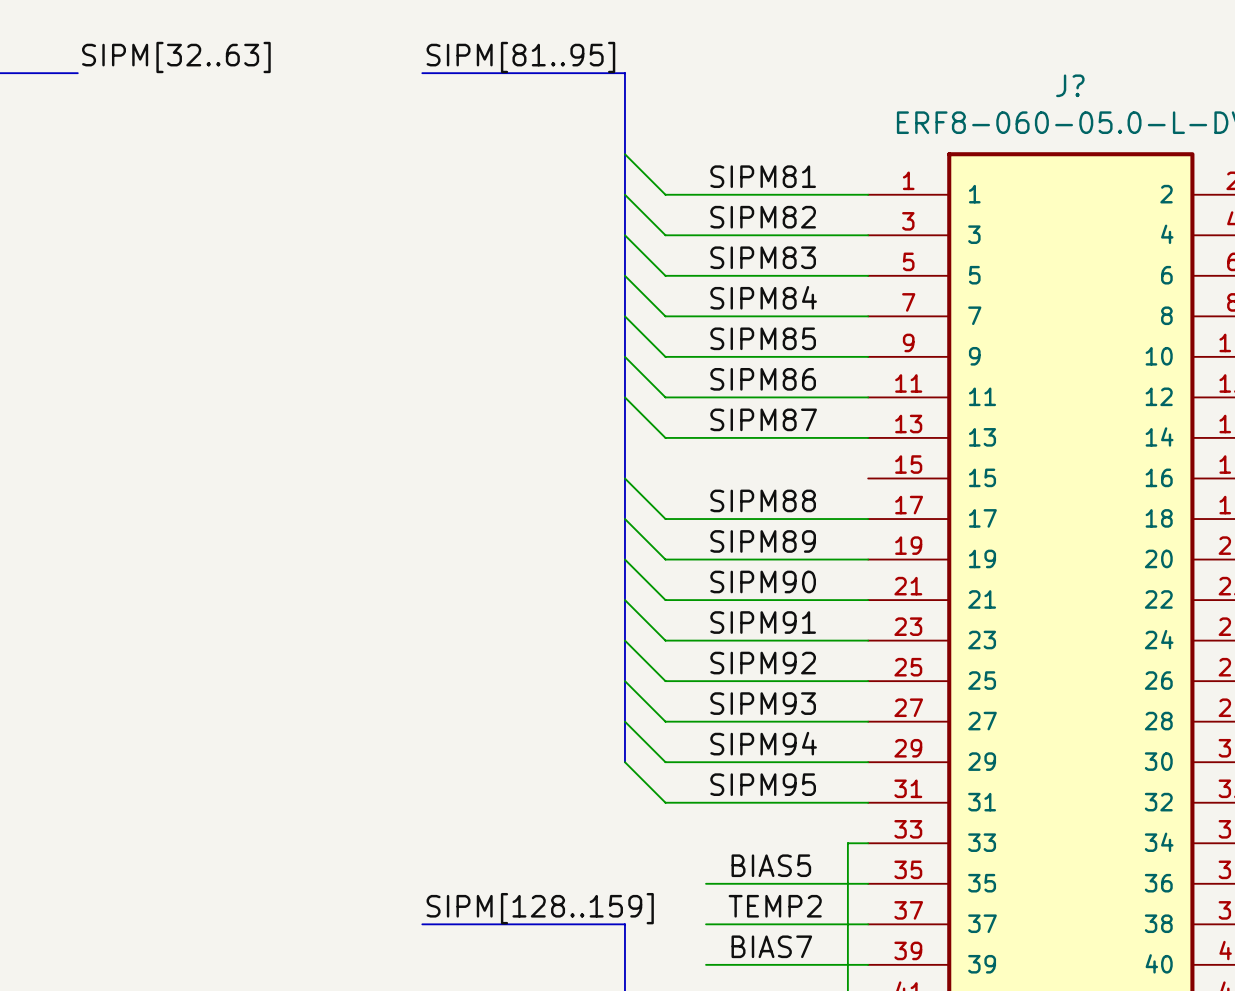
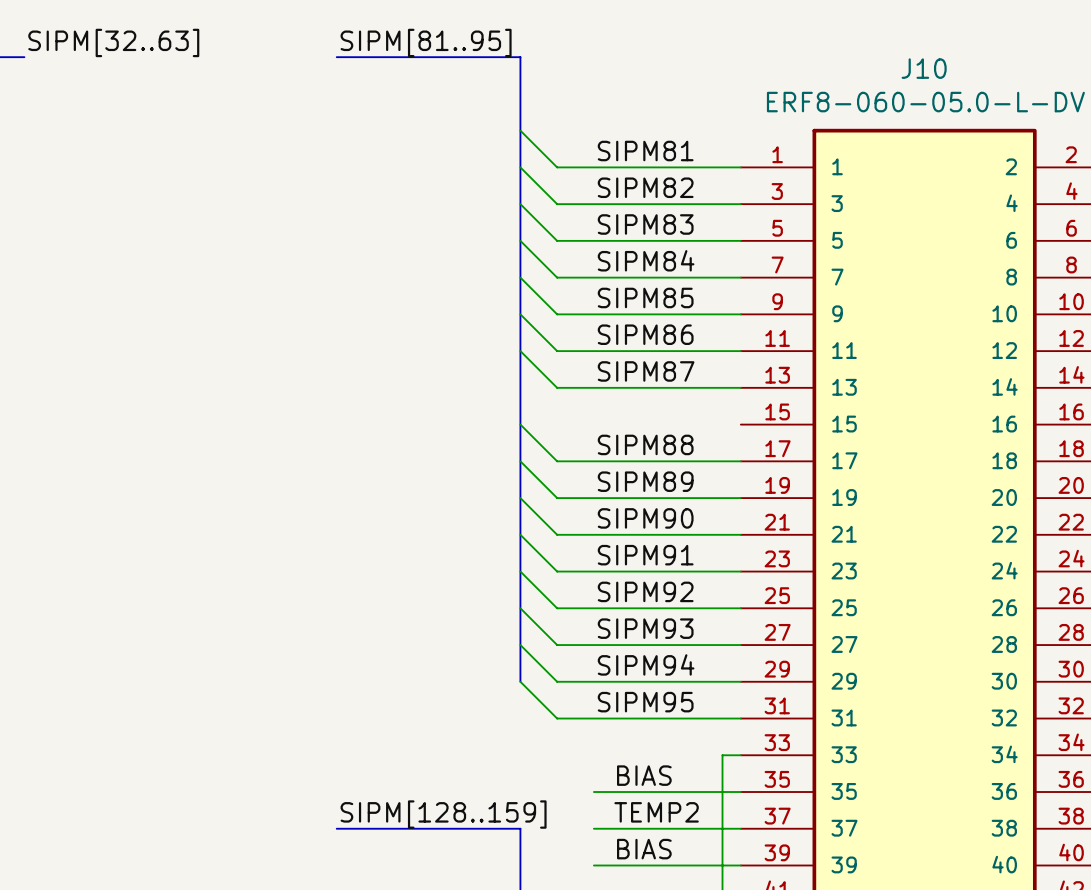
J? name: J? (1070, 85) -> J10 (924, 68)
label: BIAS5 (771, 865) -> BIAS (644, 775)
label: BIAS7 (771, 946) -> BIAS (644, 849)

